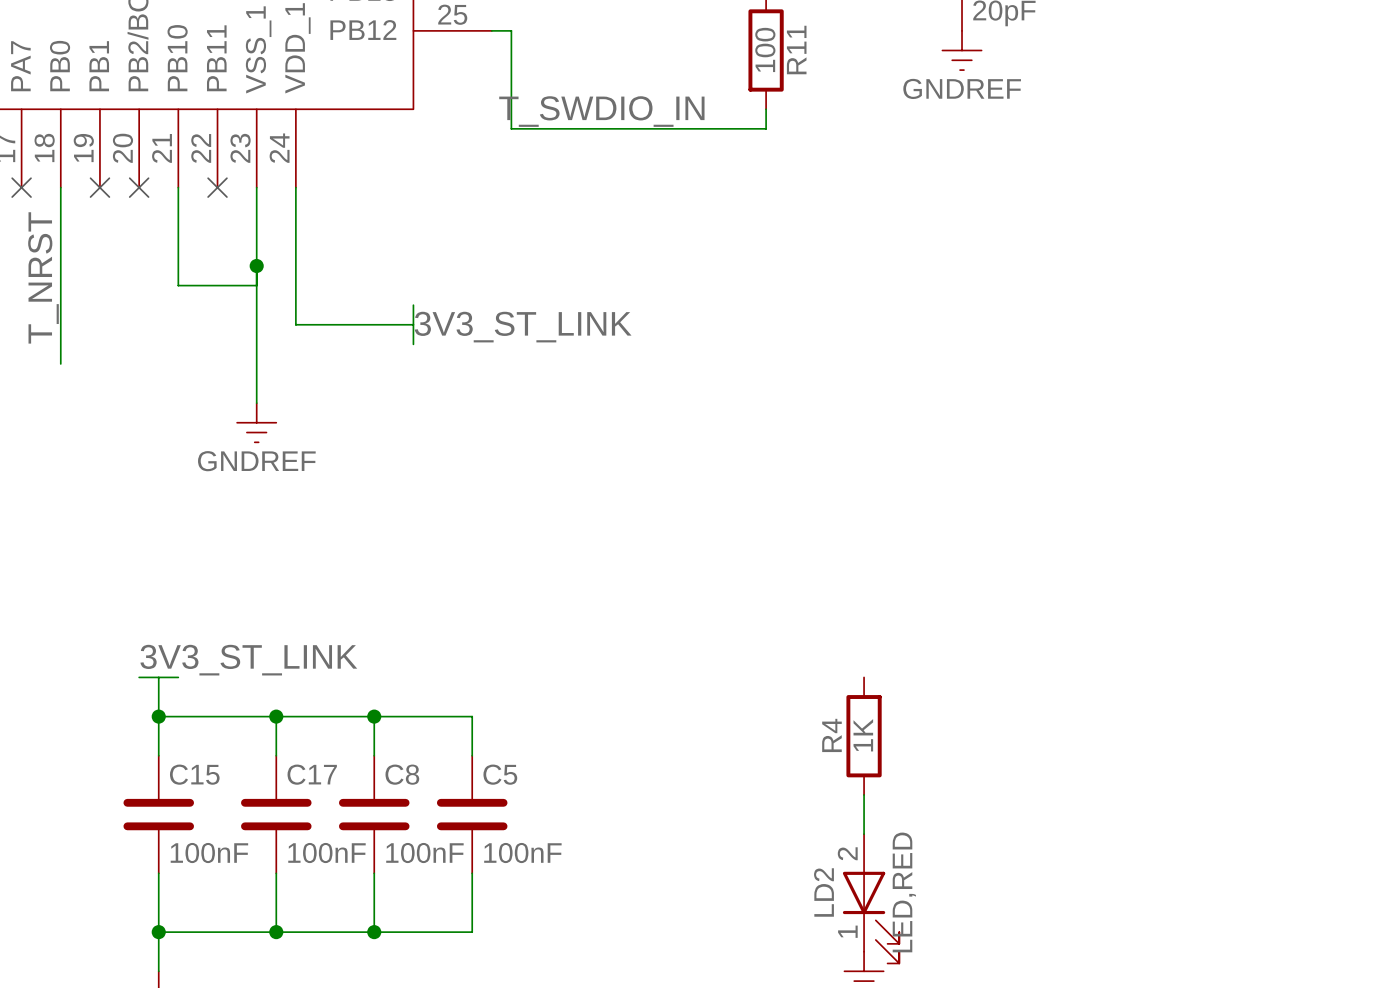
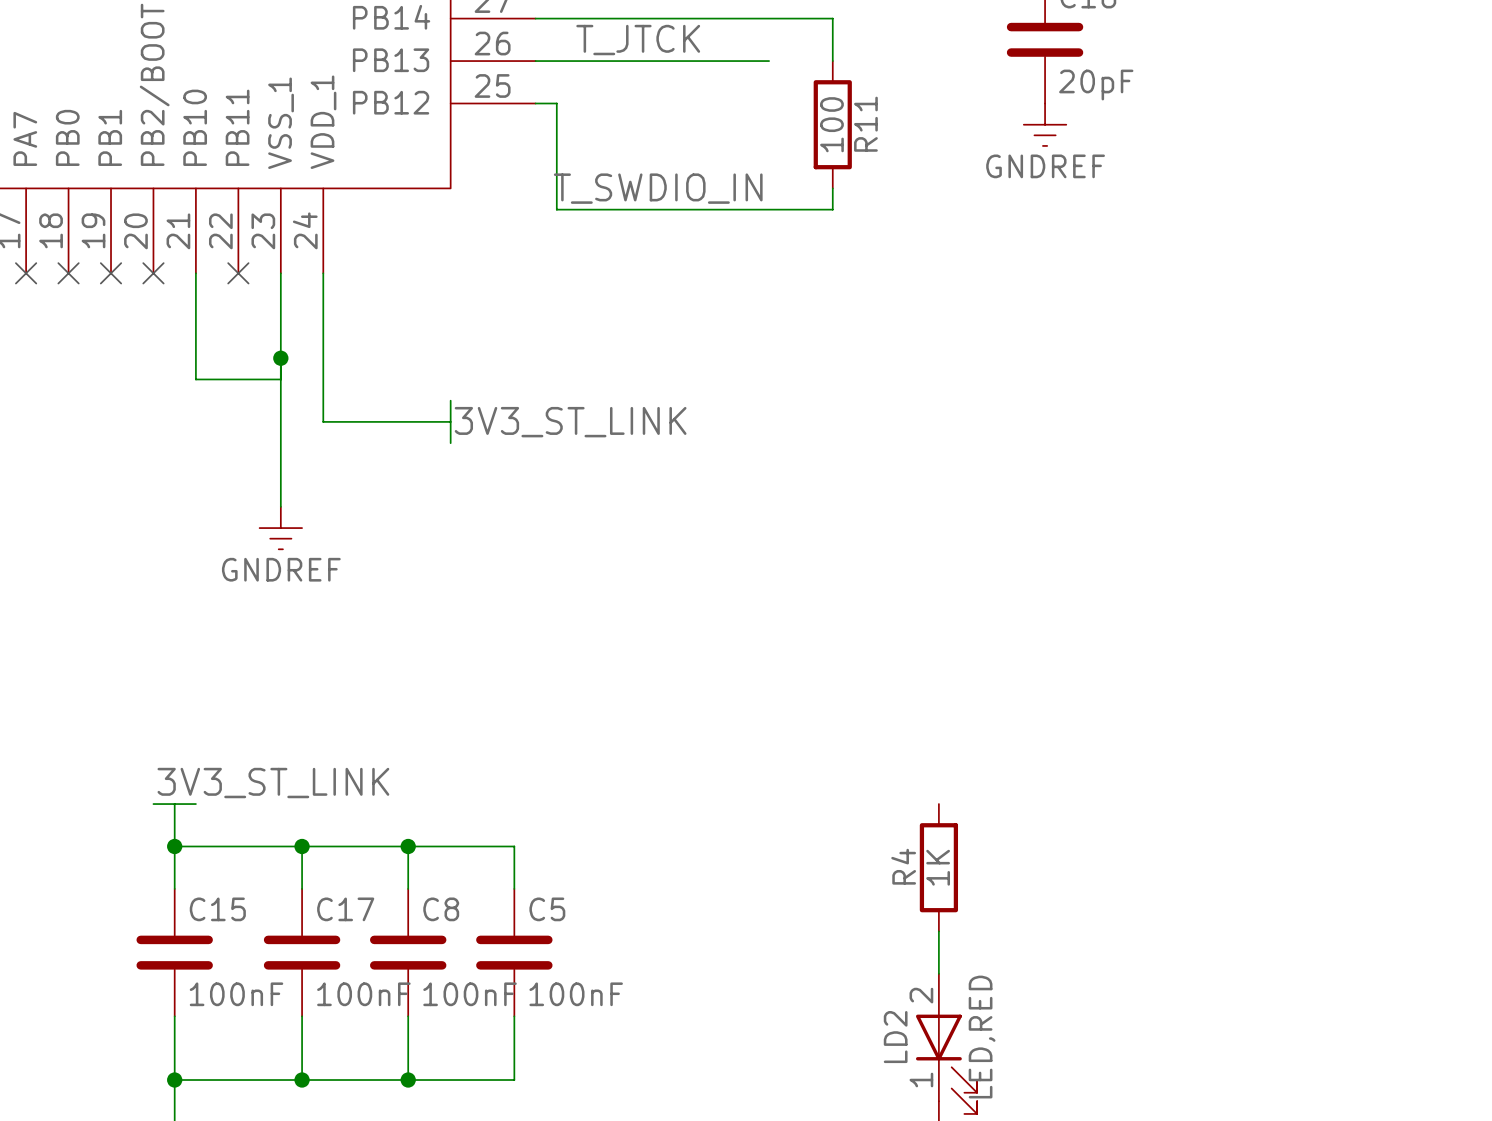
wire: (60, 187) (60, 363) -> none
no-connect mark: none -> (68, 273)
label: T_NRST (43, 277) -> none

